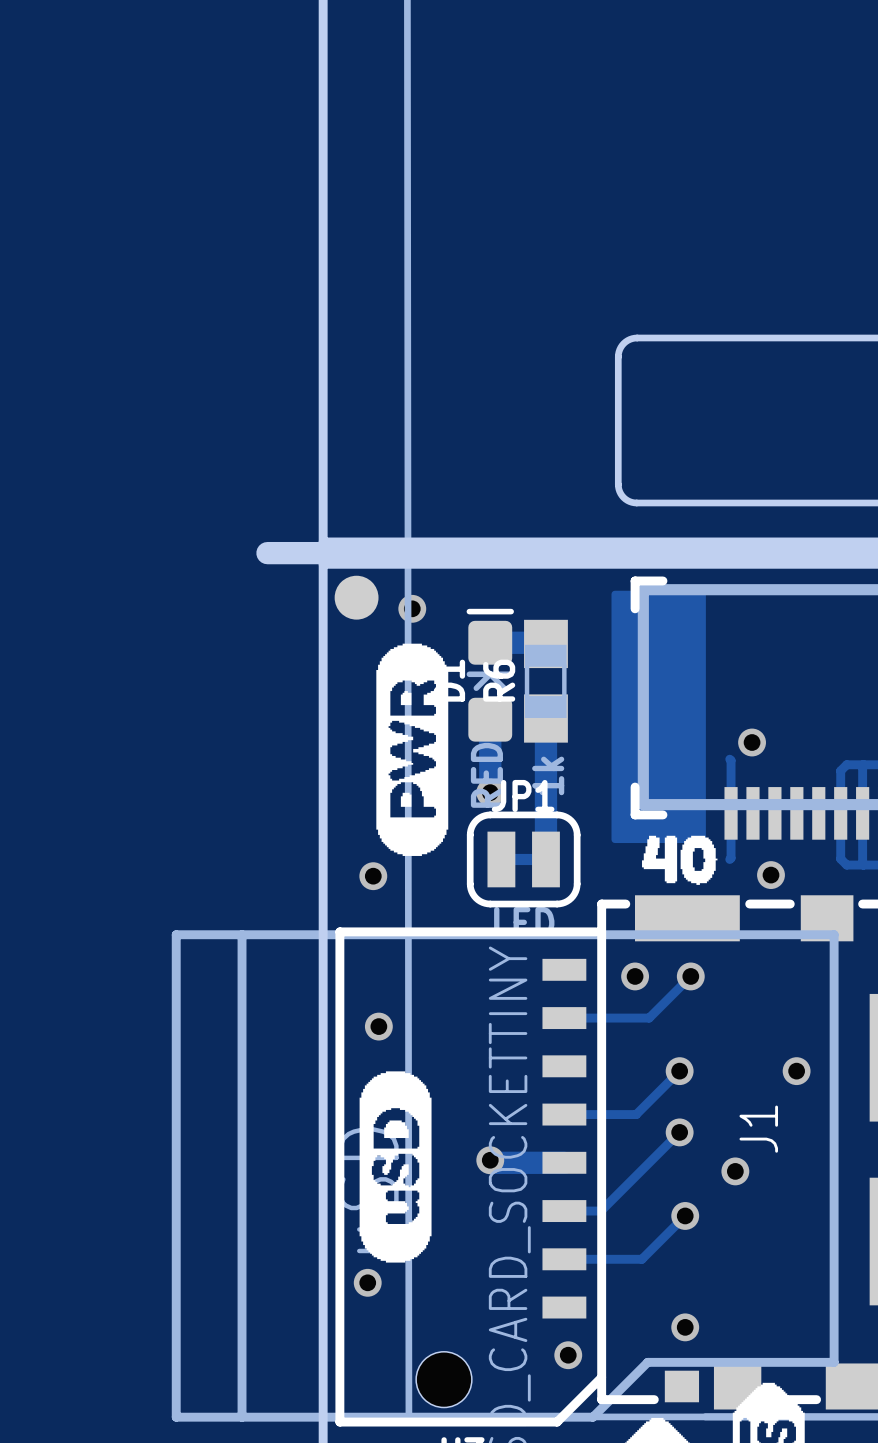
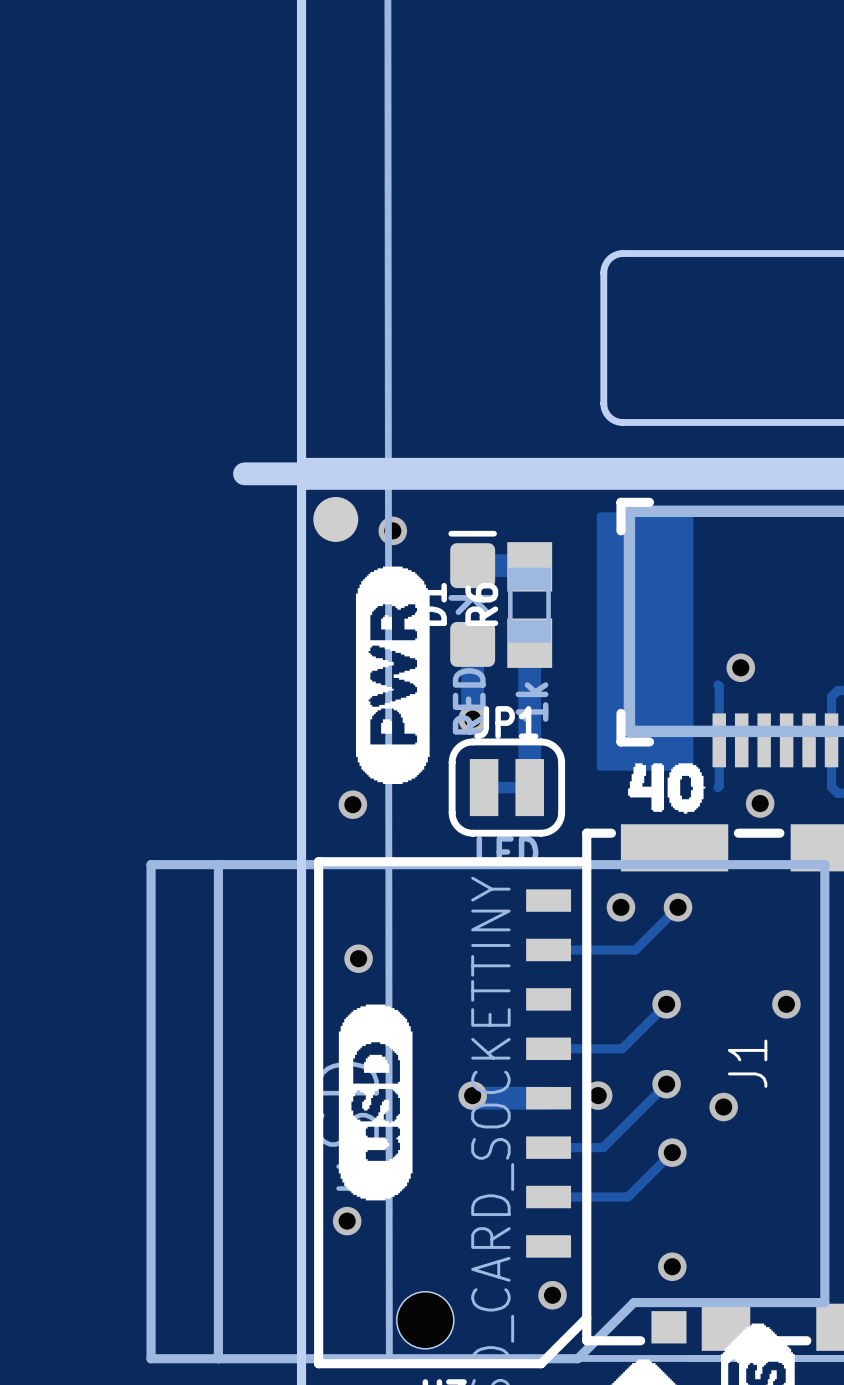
track: (679, 1132) (601, 1211) -> (666, 1084) (603, 1147) (586, 1147)
via position: (679, 1132) -> (666, 1084)
via: none -> (598, 1095)

